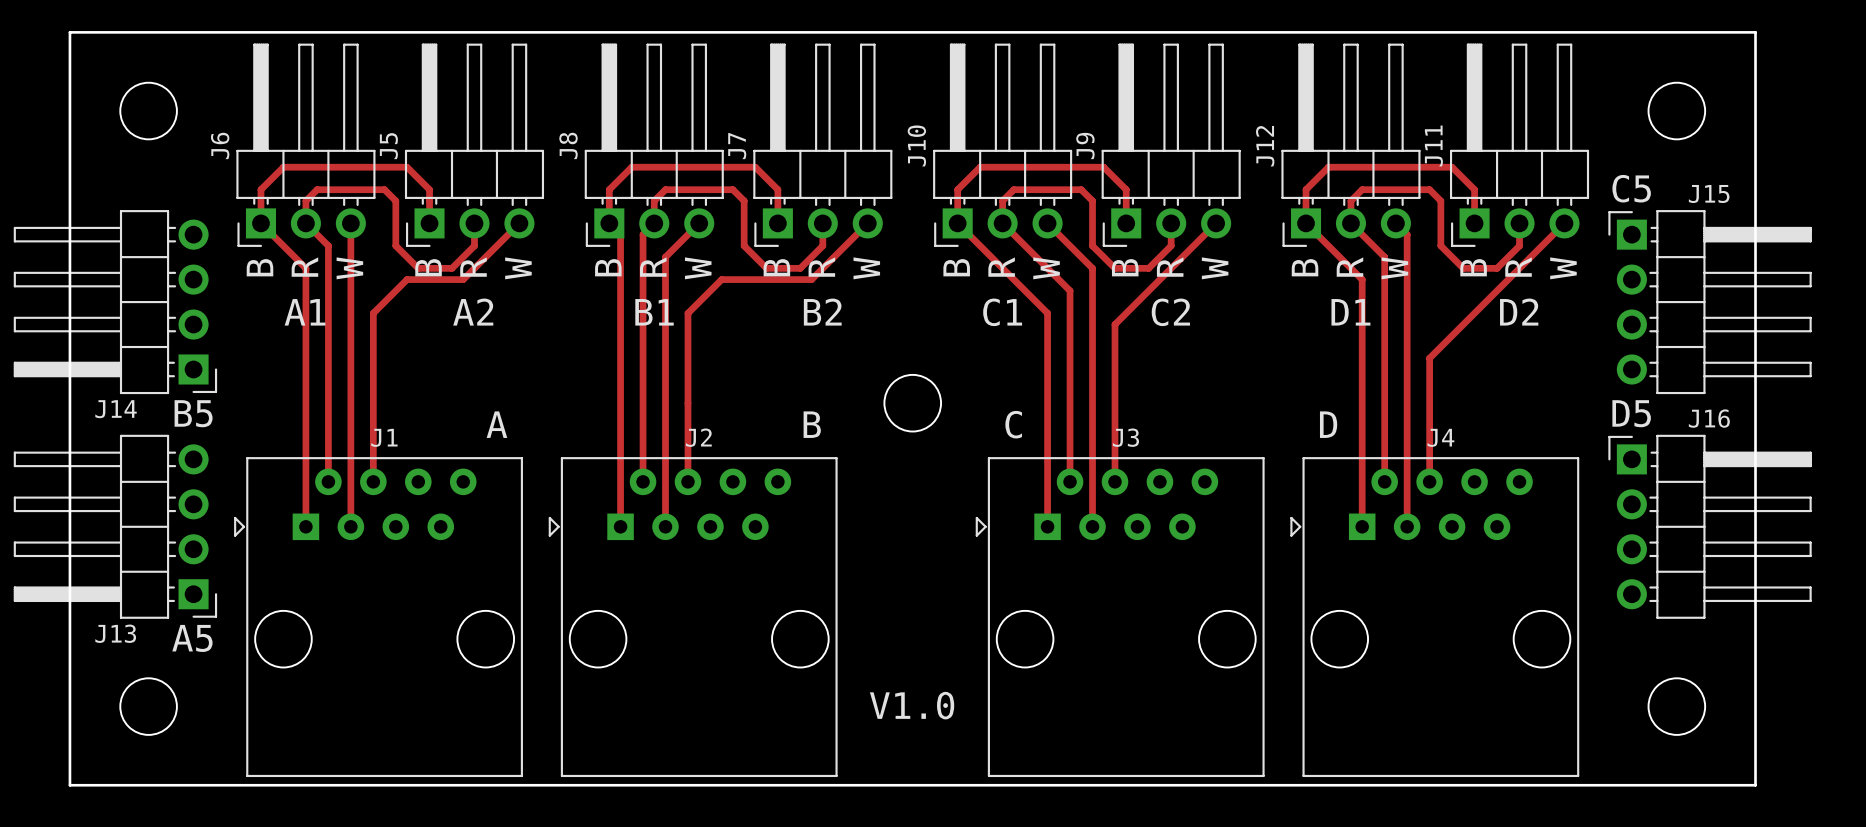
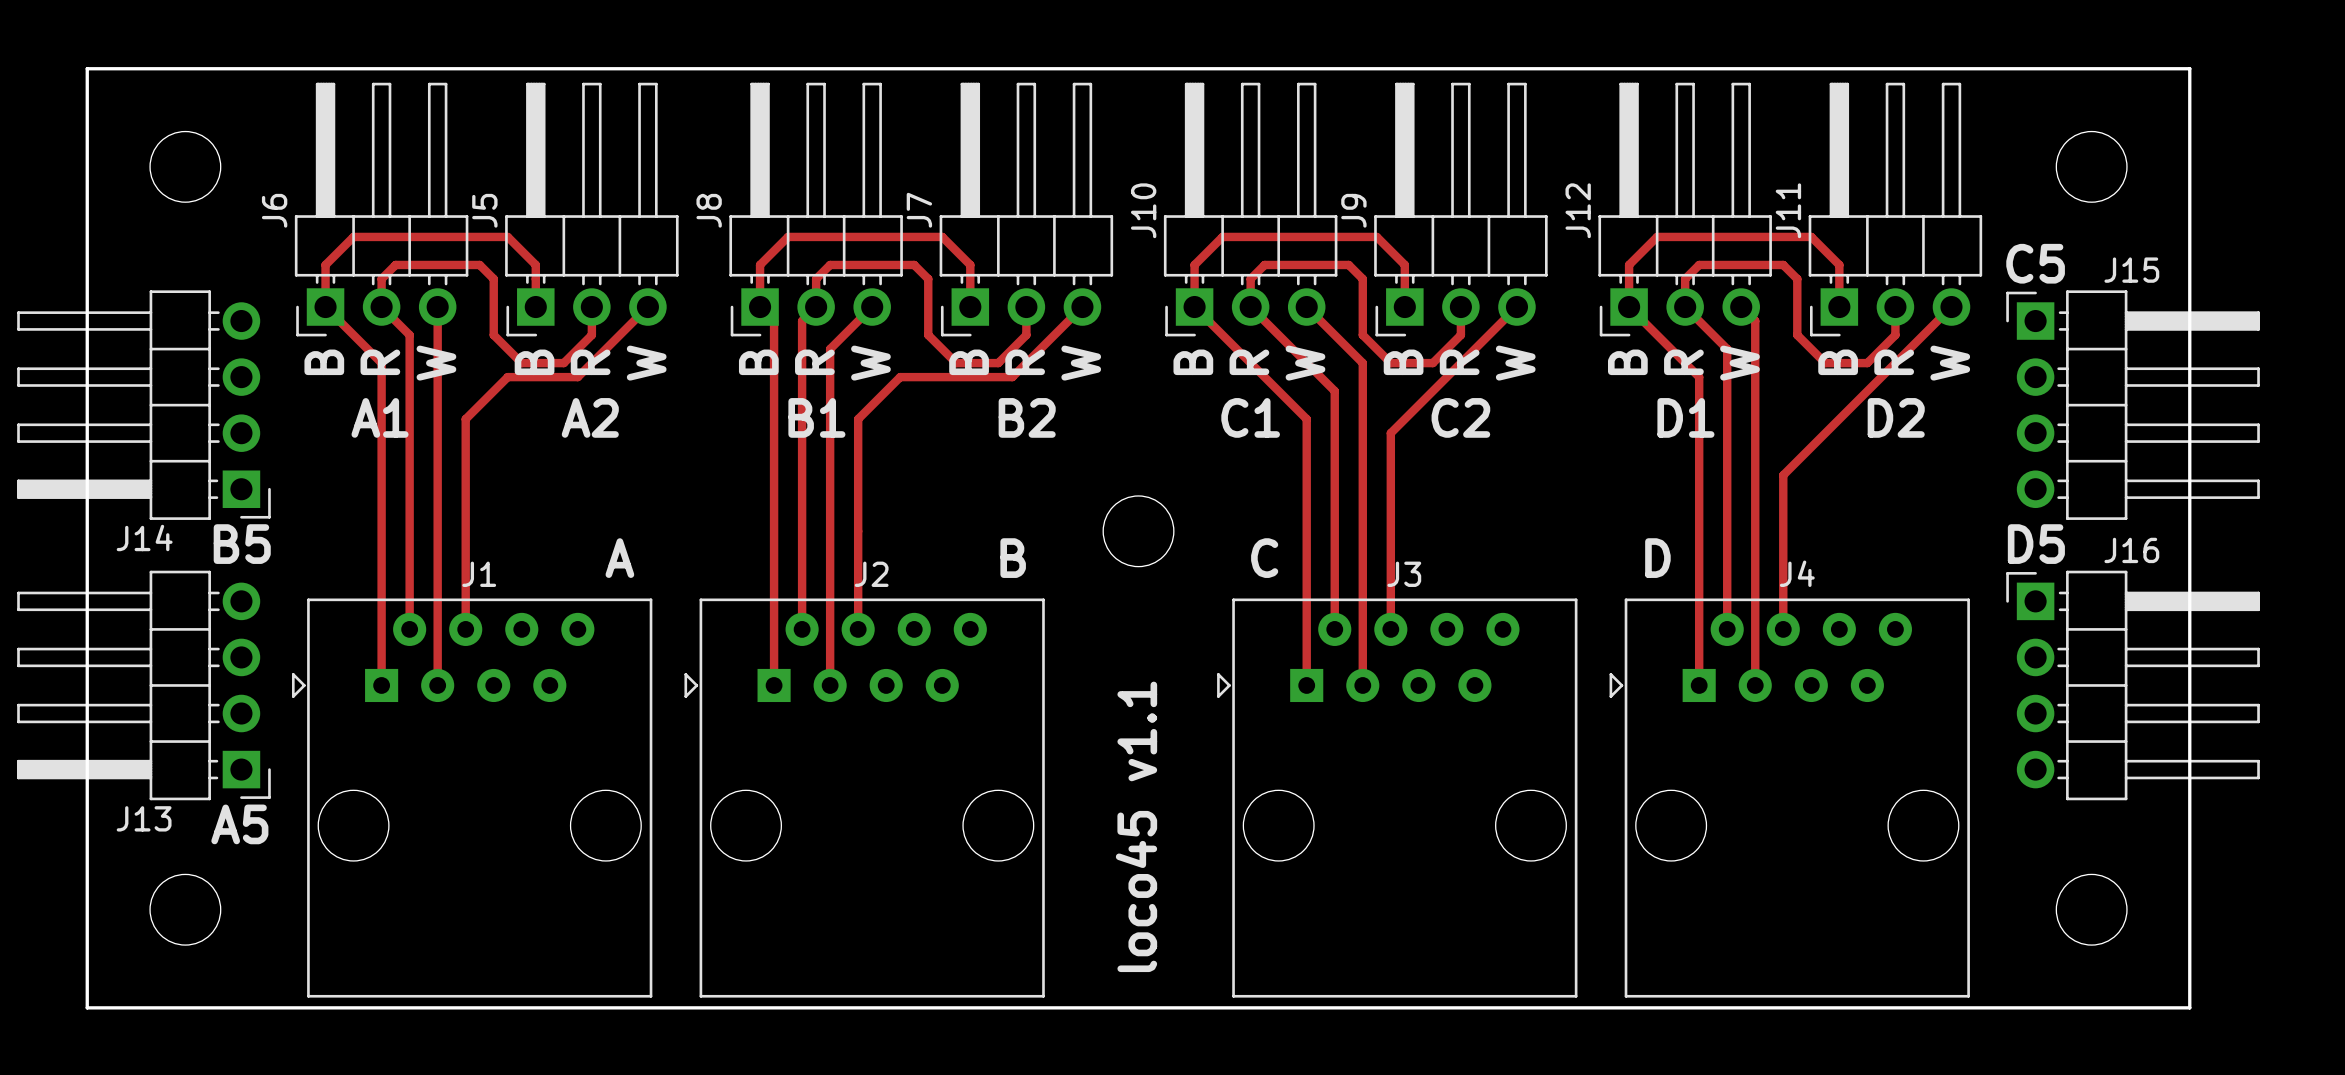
text: none -> loco45 v1.1 (1136, 826)
text: V1.0 (912, 705) -> none

